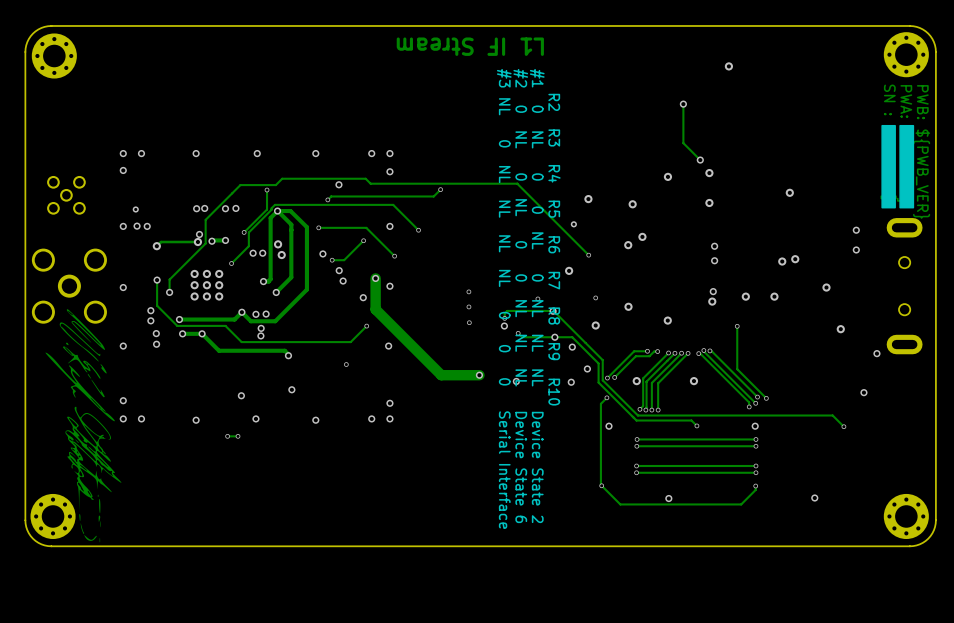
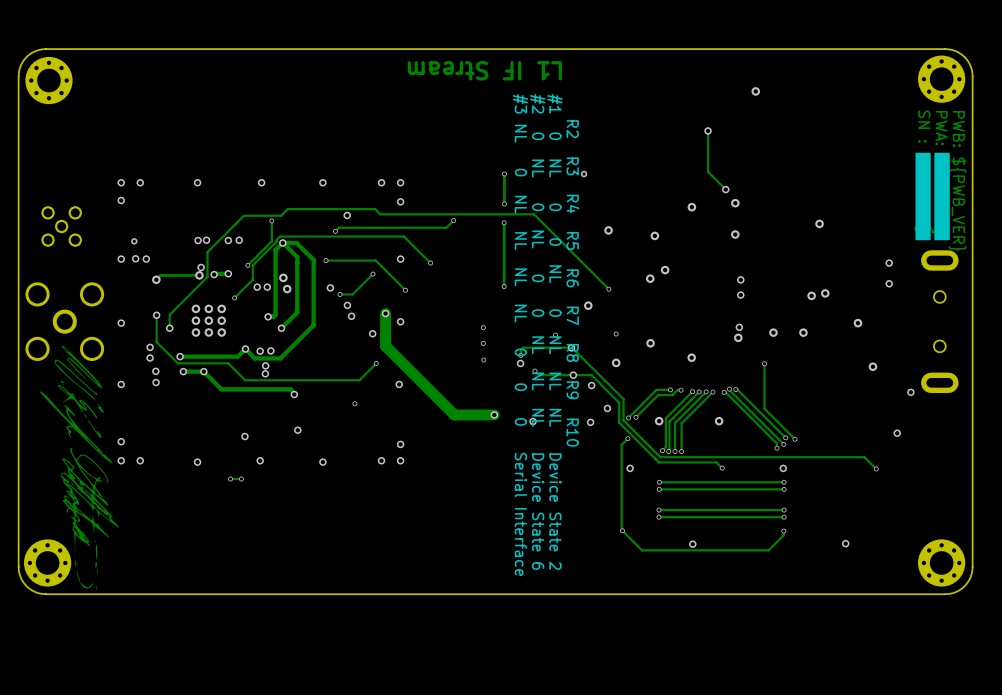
track: none -> (504, 174) (504, 204)
via: none -> (504, 174)
via: none -> (584, 174)
via: none -> (504, 204)
track: none -> (504, 222) (504, 286)
via: none -> (504, 222)
via: (573, 224) -> none
via: none -> (504, 286)

